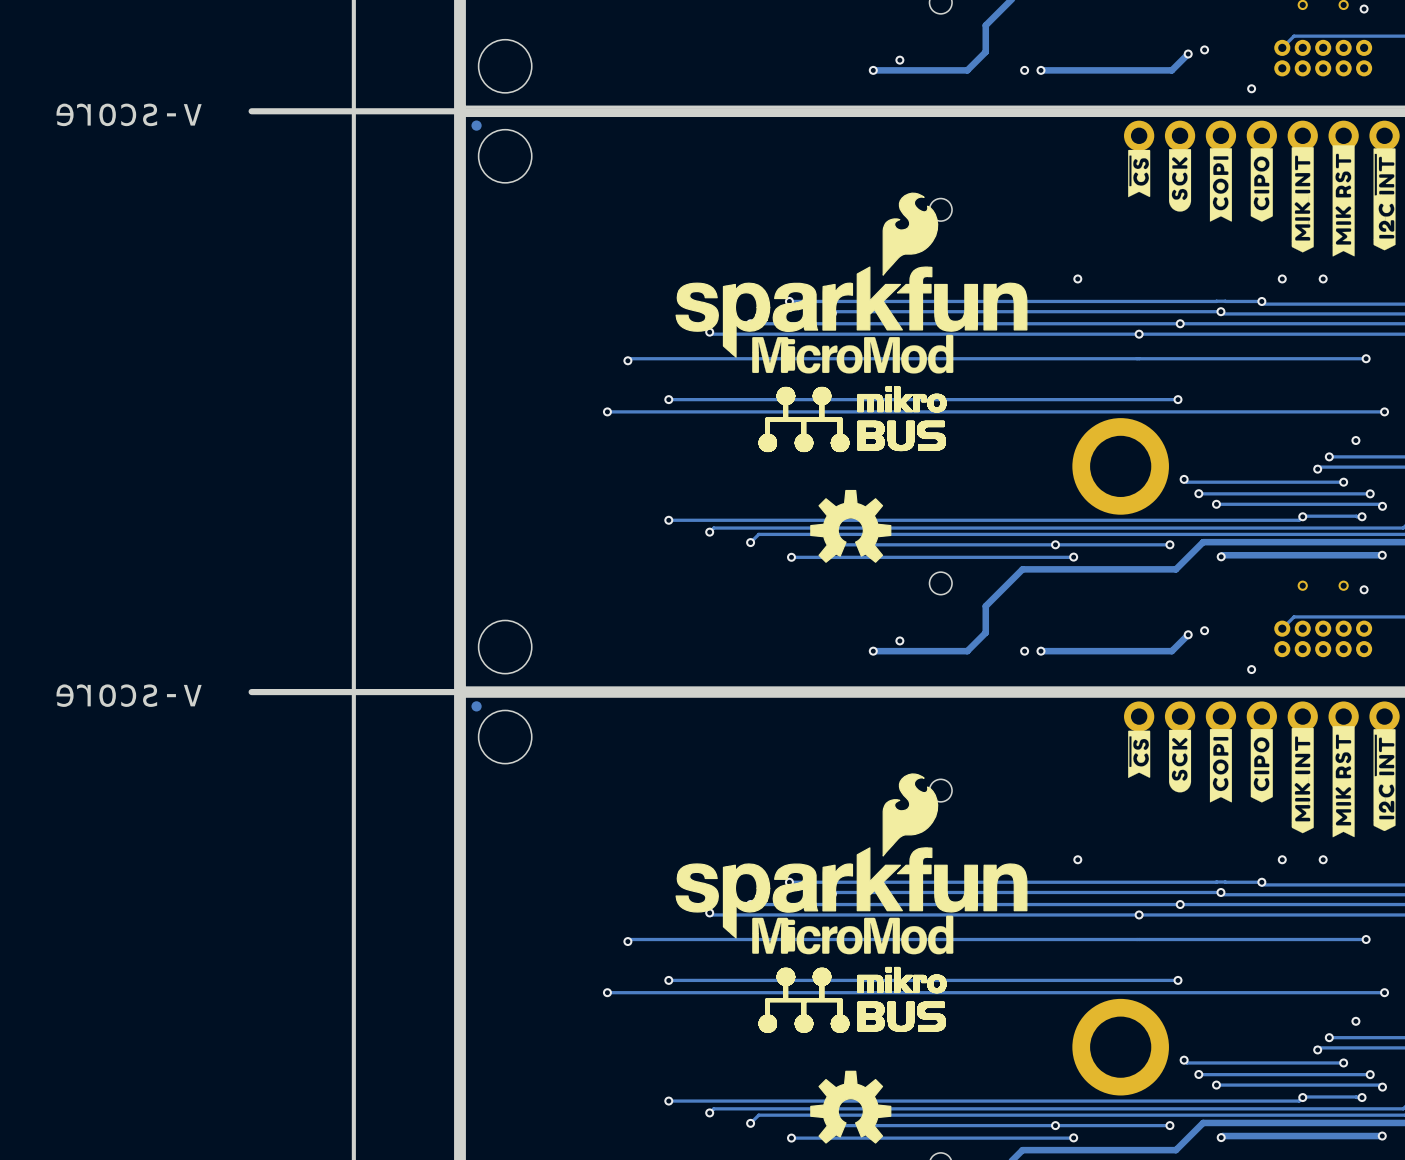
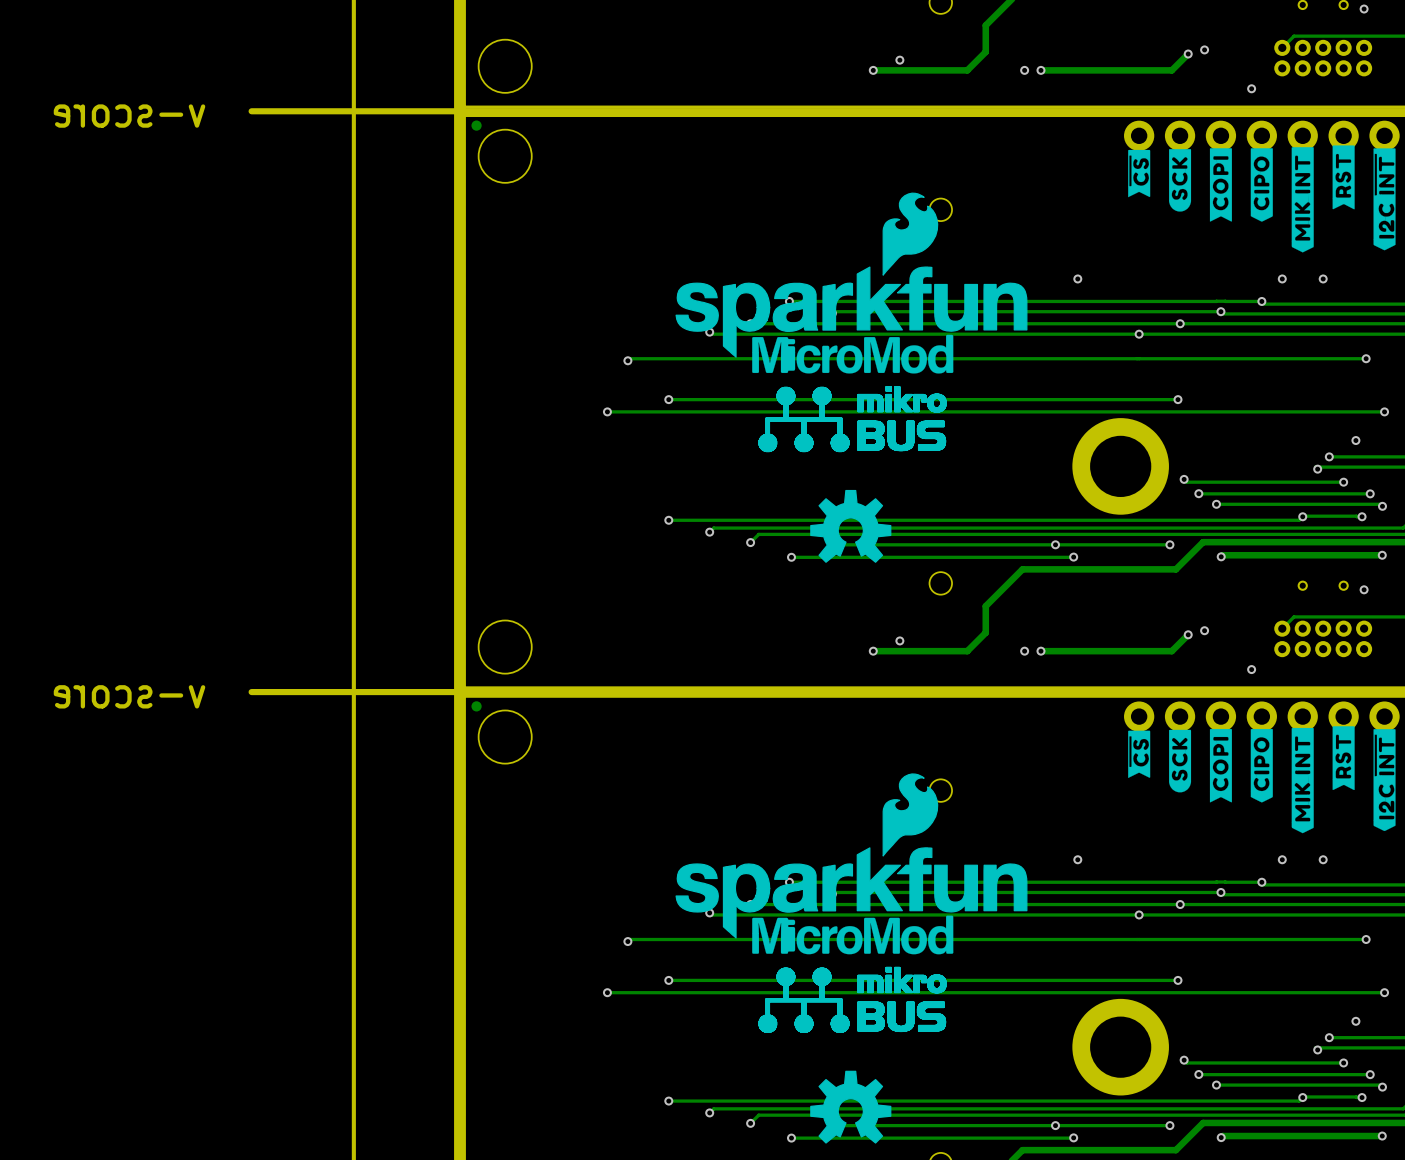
drawing: [1332, 145, 1355, 257] -> none
drawing: none -> [1332, 145, 1355, 210]
drawing: [1332, 726, 1355, 838] -> none
drawing: none -> [1332, 726, 1355, 790]

